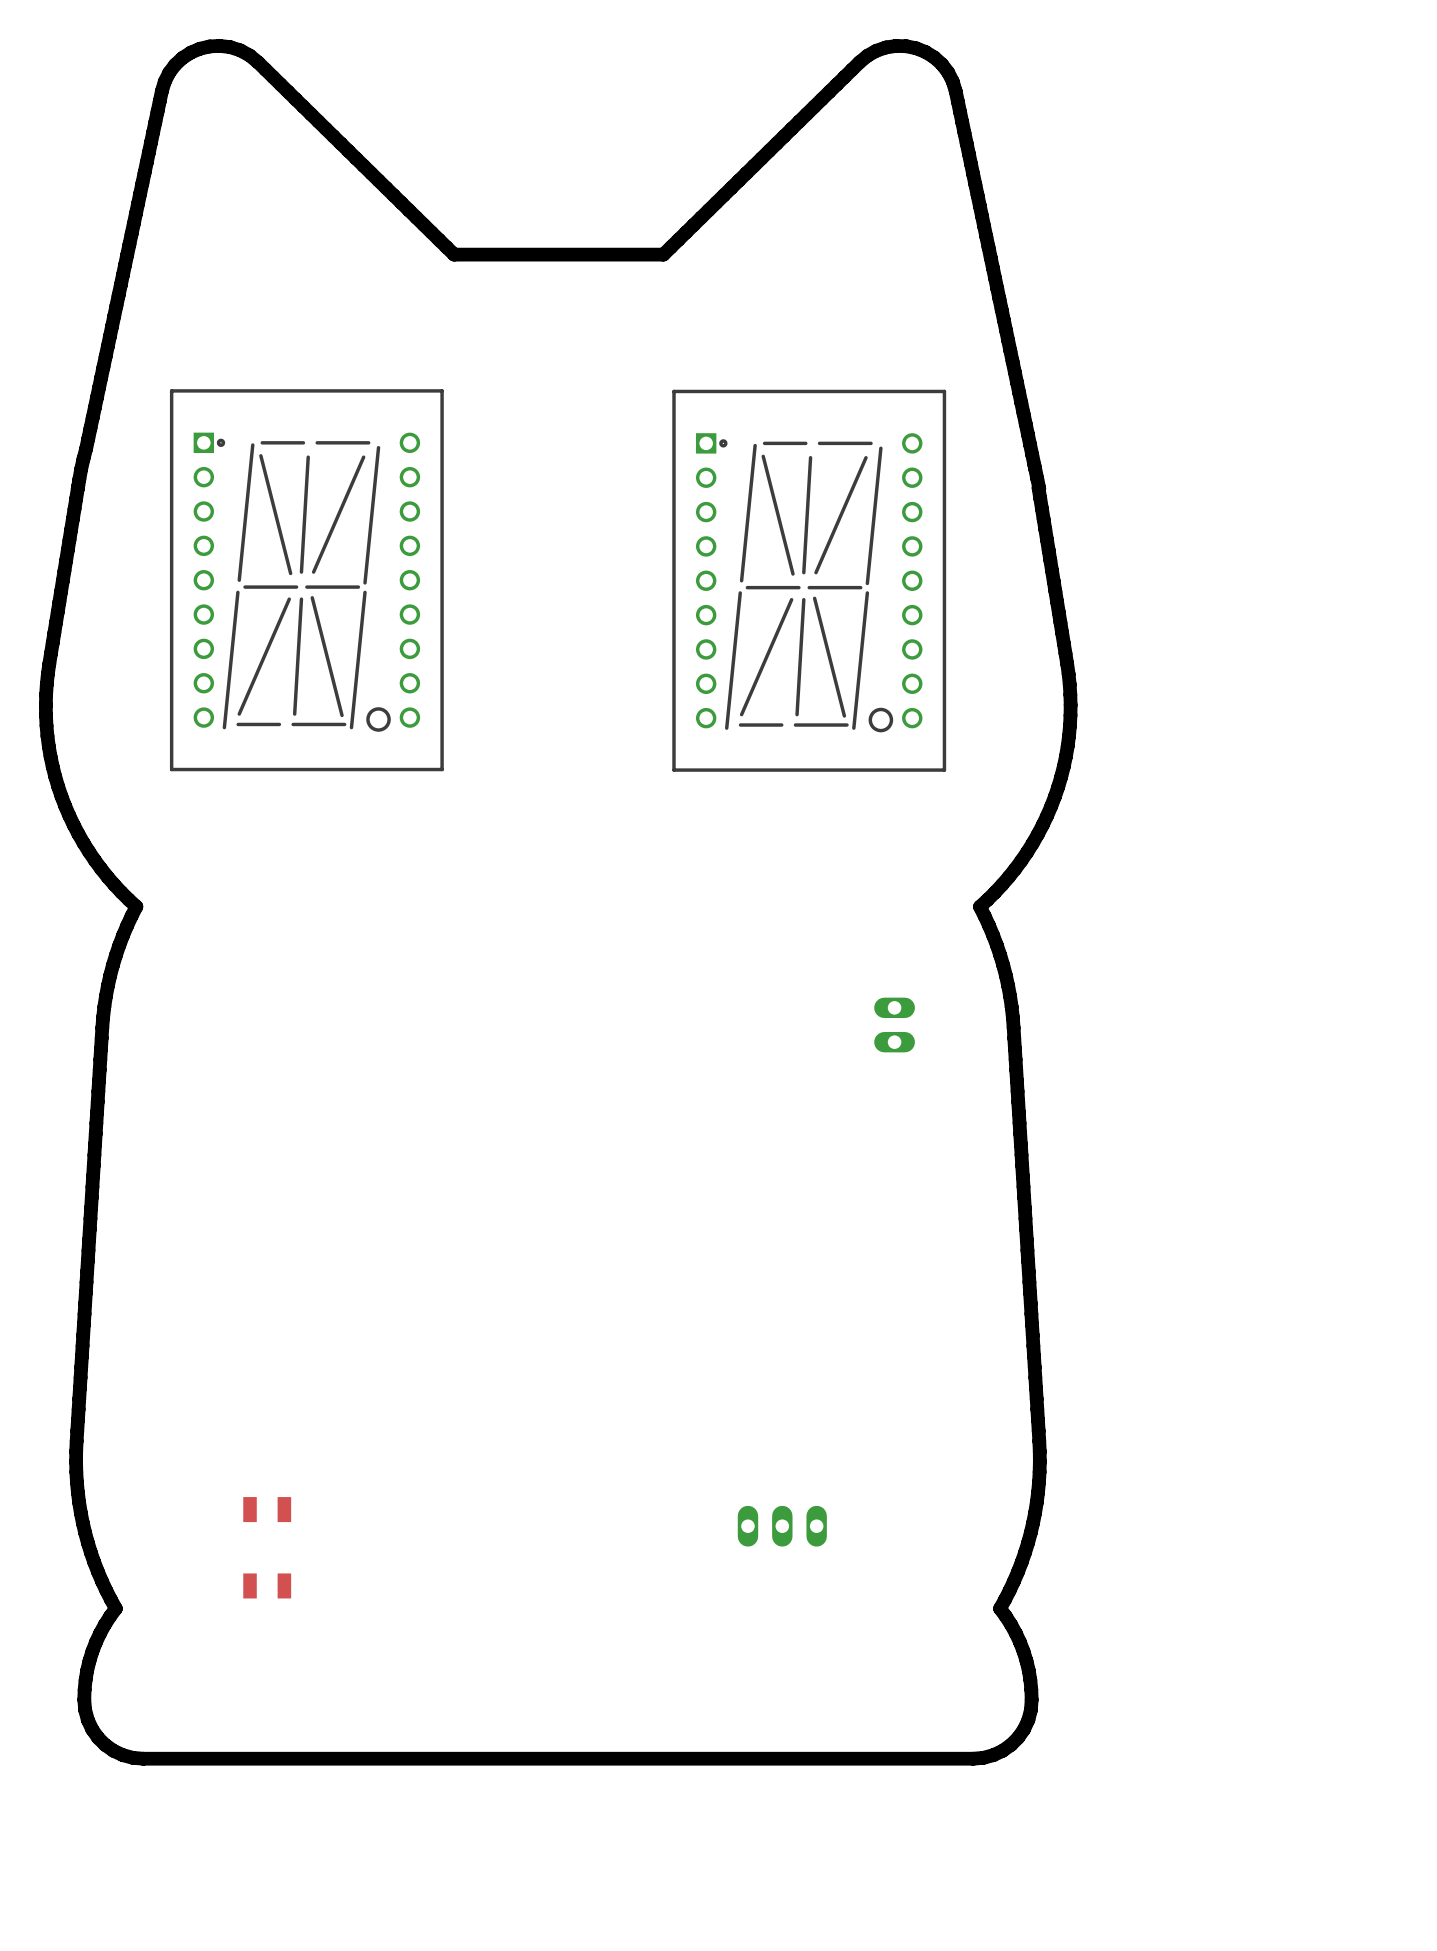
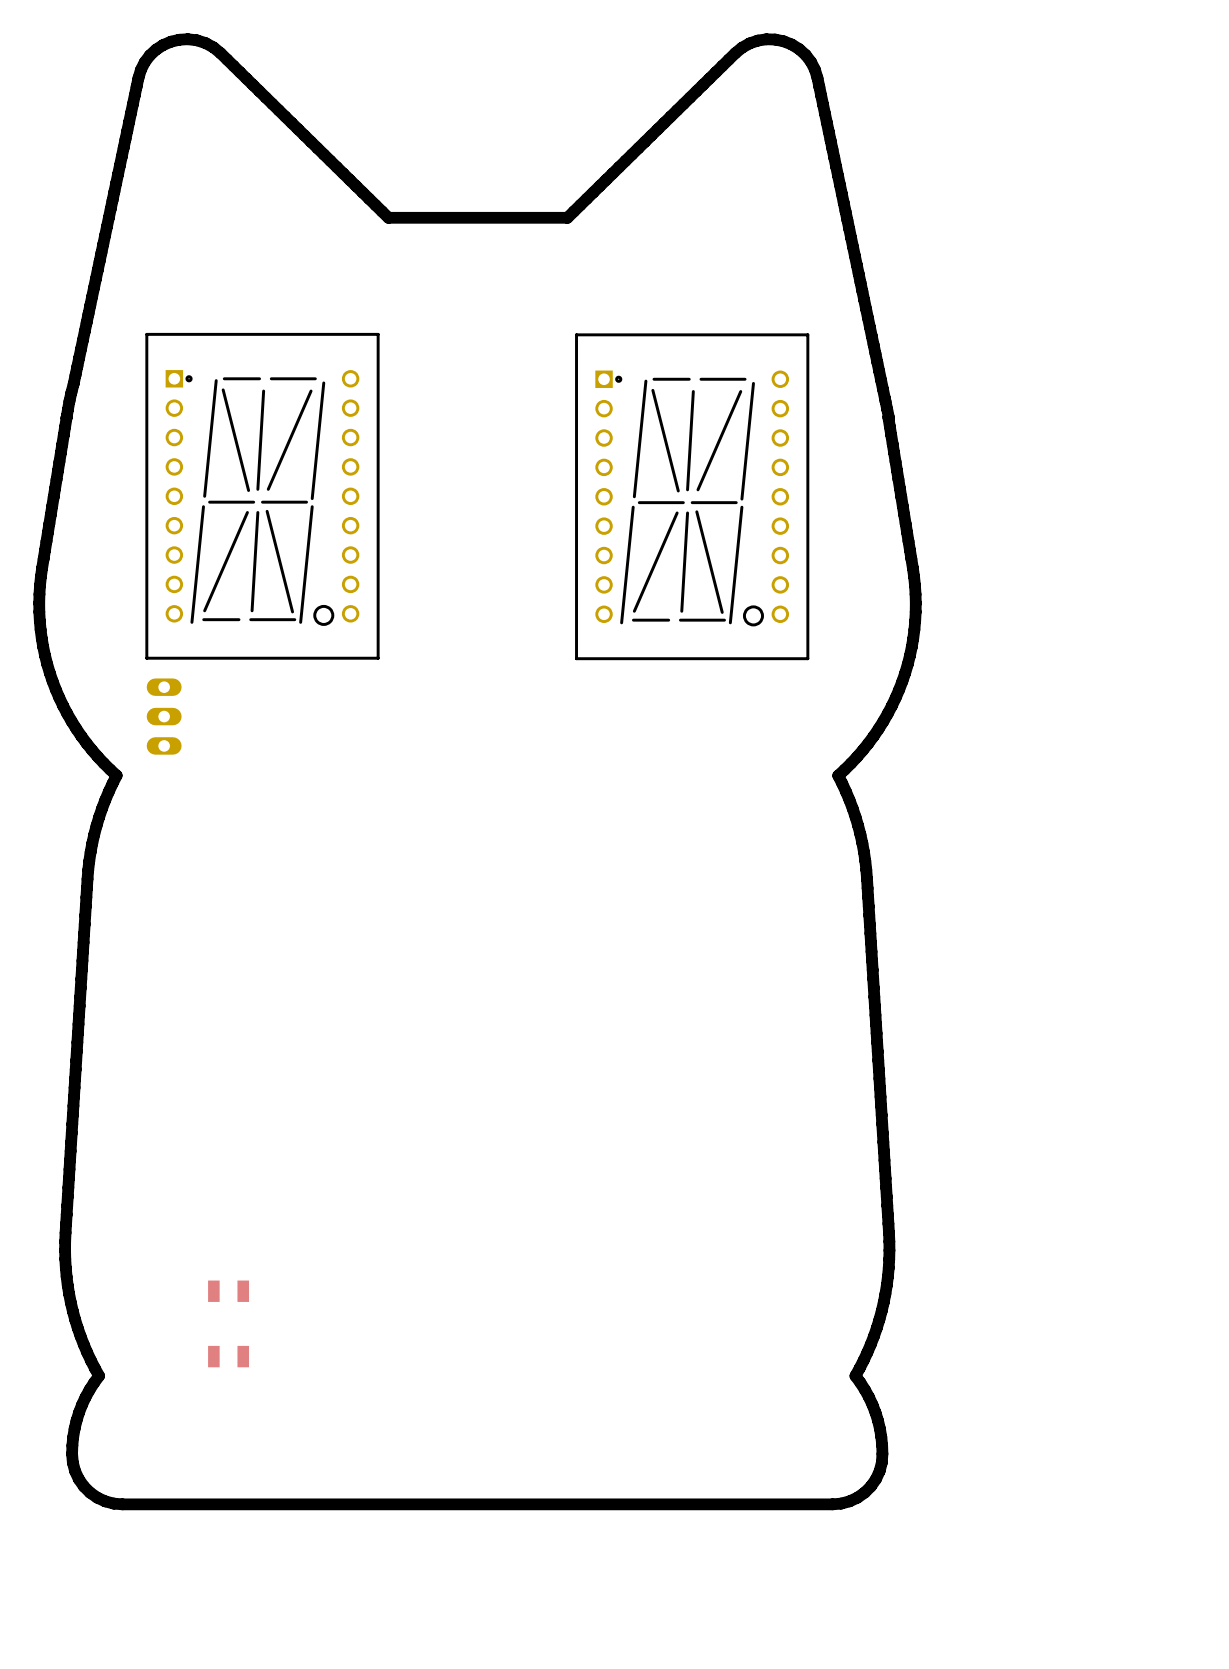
part: none -> (164, 716)
part: (894, 1025) -> none
part: (782, 1526) -> none

